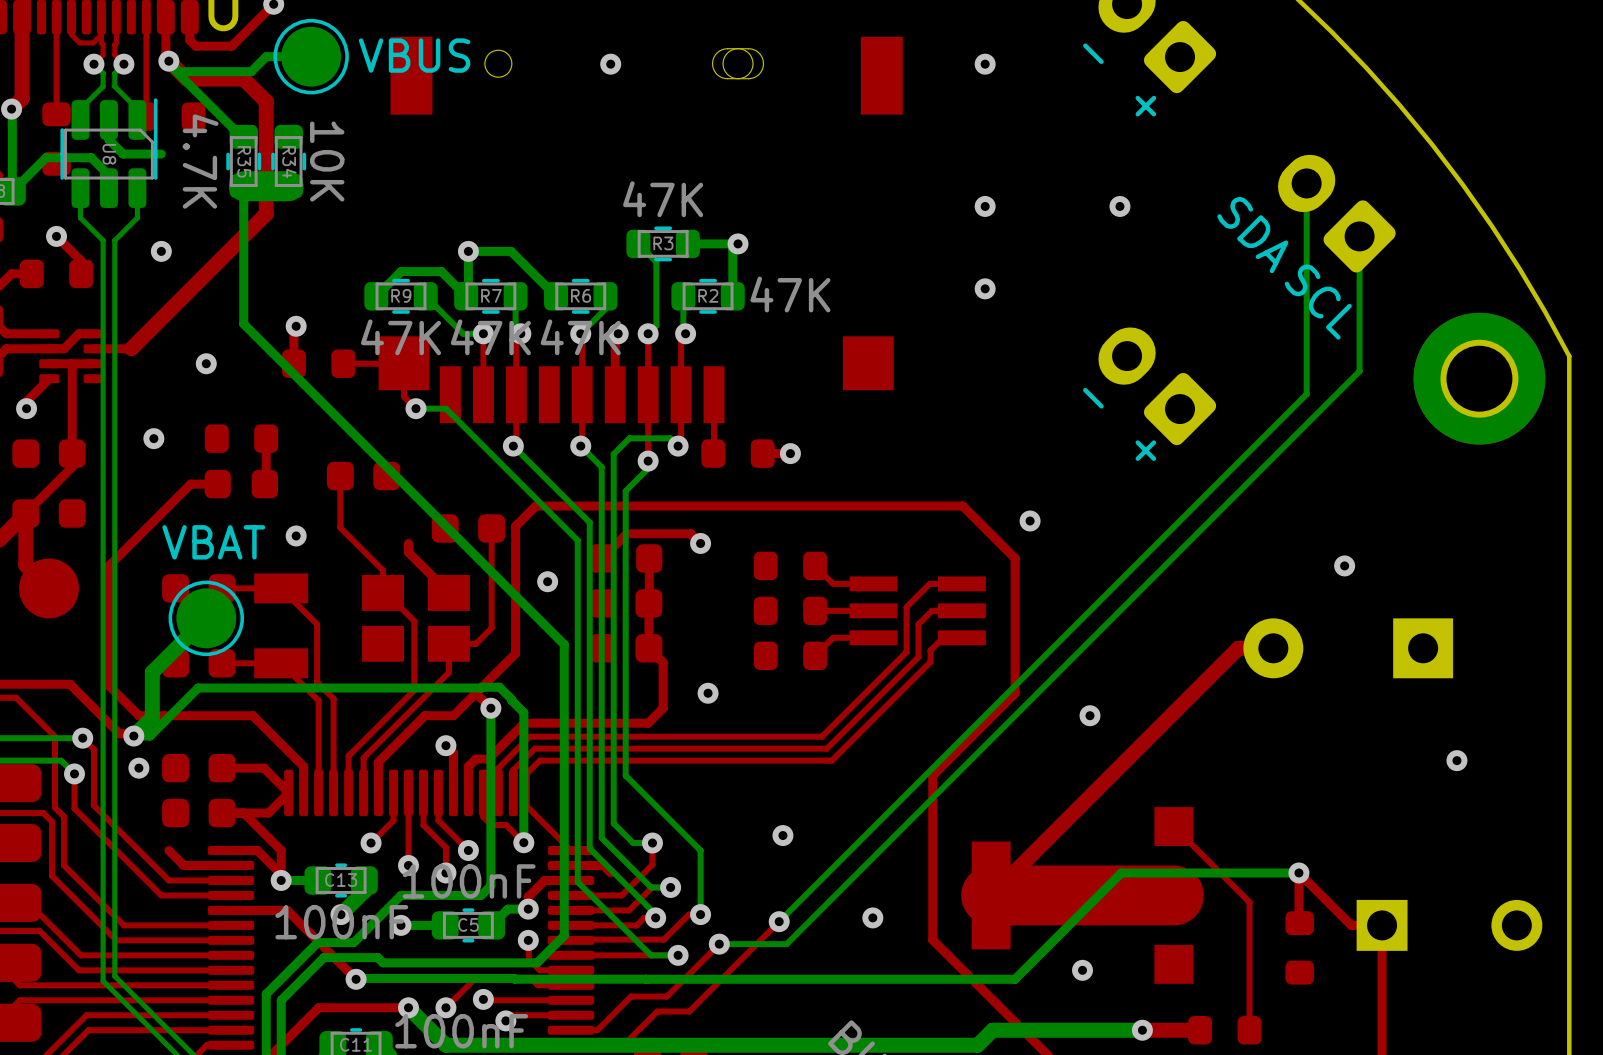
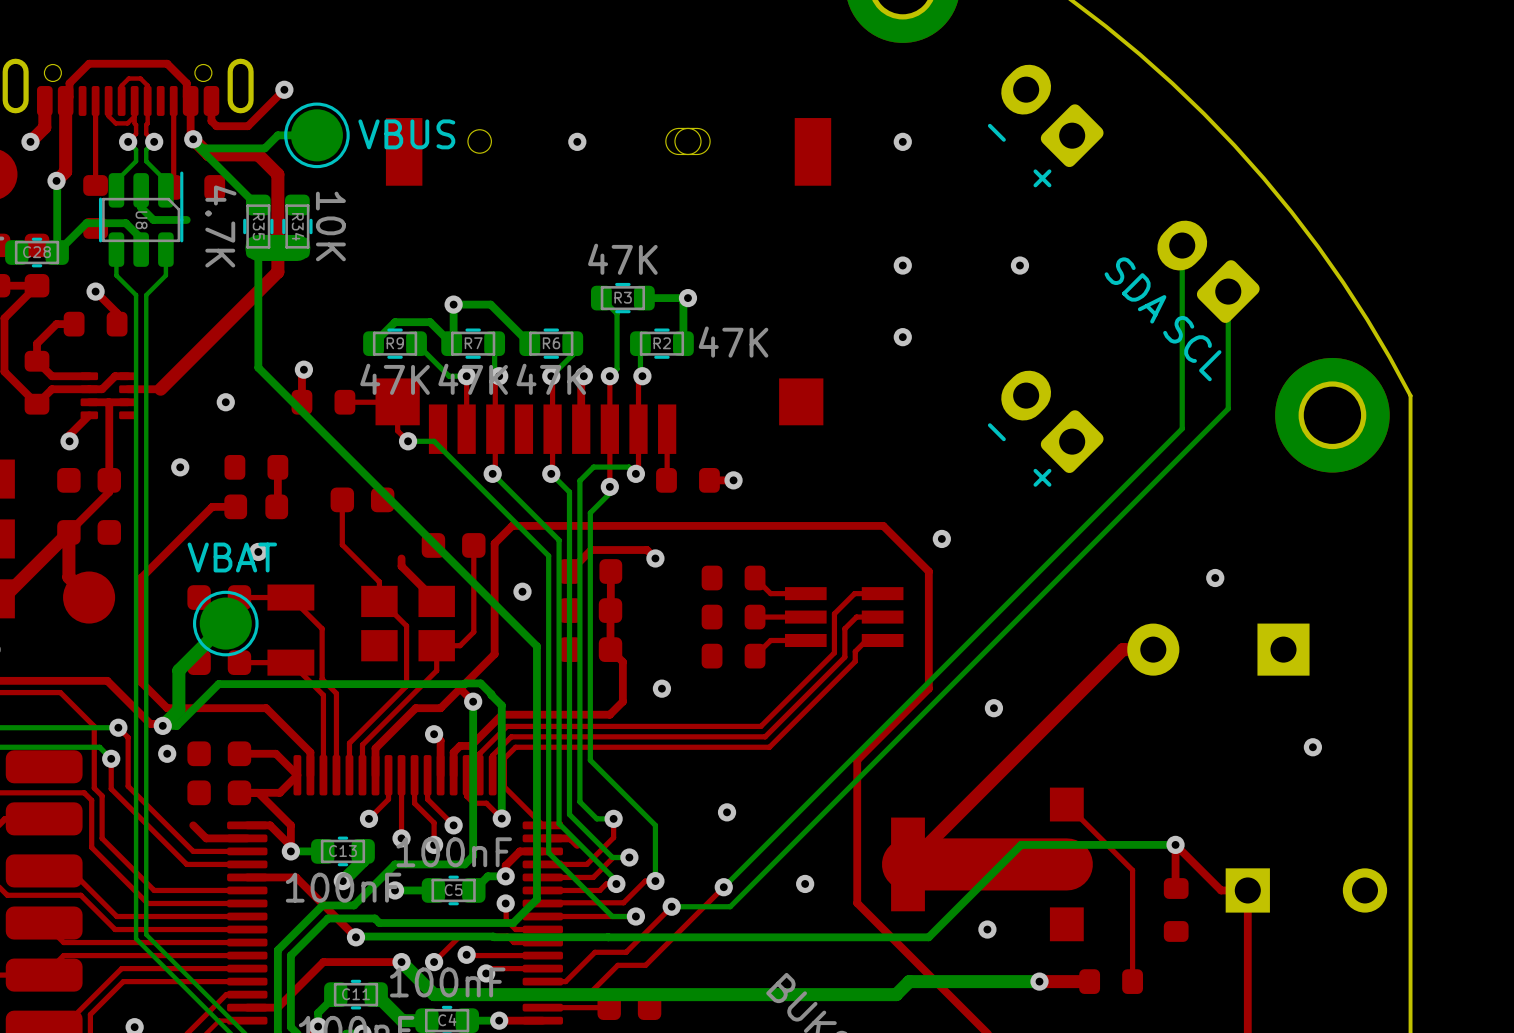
via: (161, 251) -> none
via position: (296, 535) -> (258, 551)

